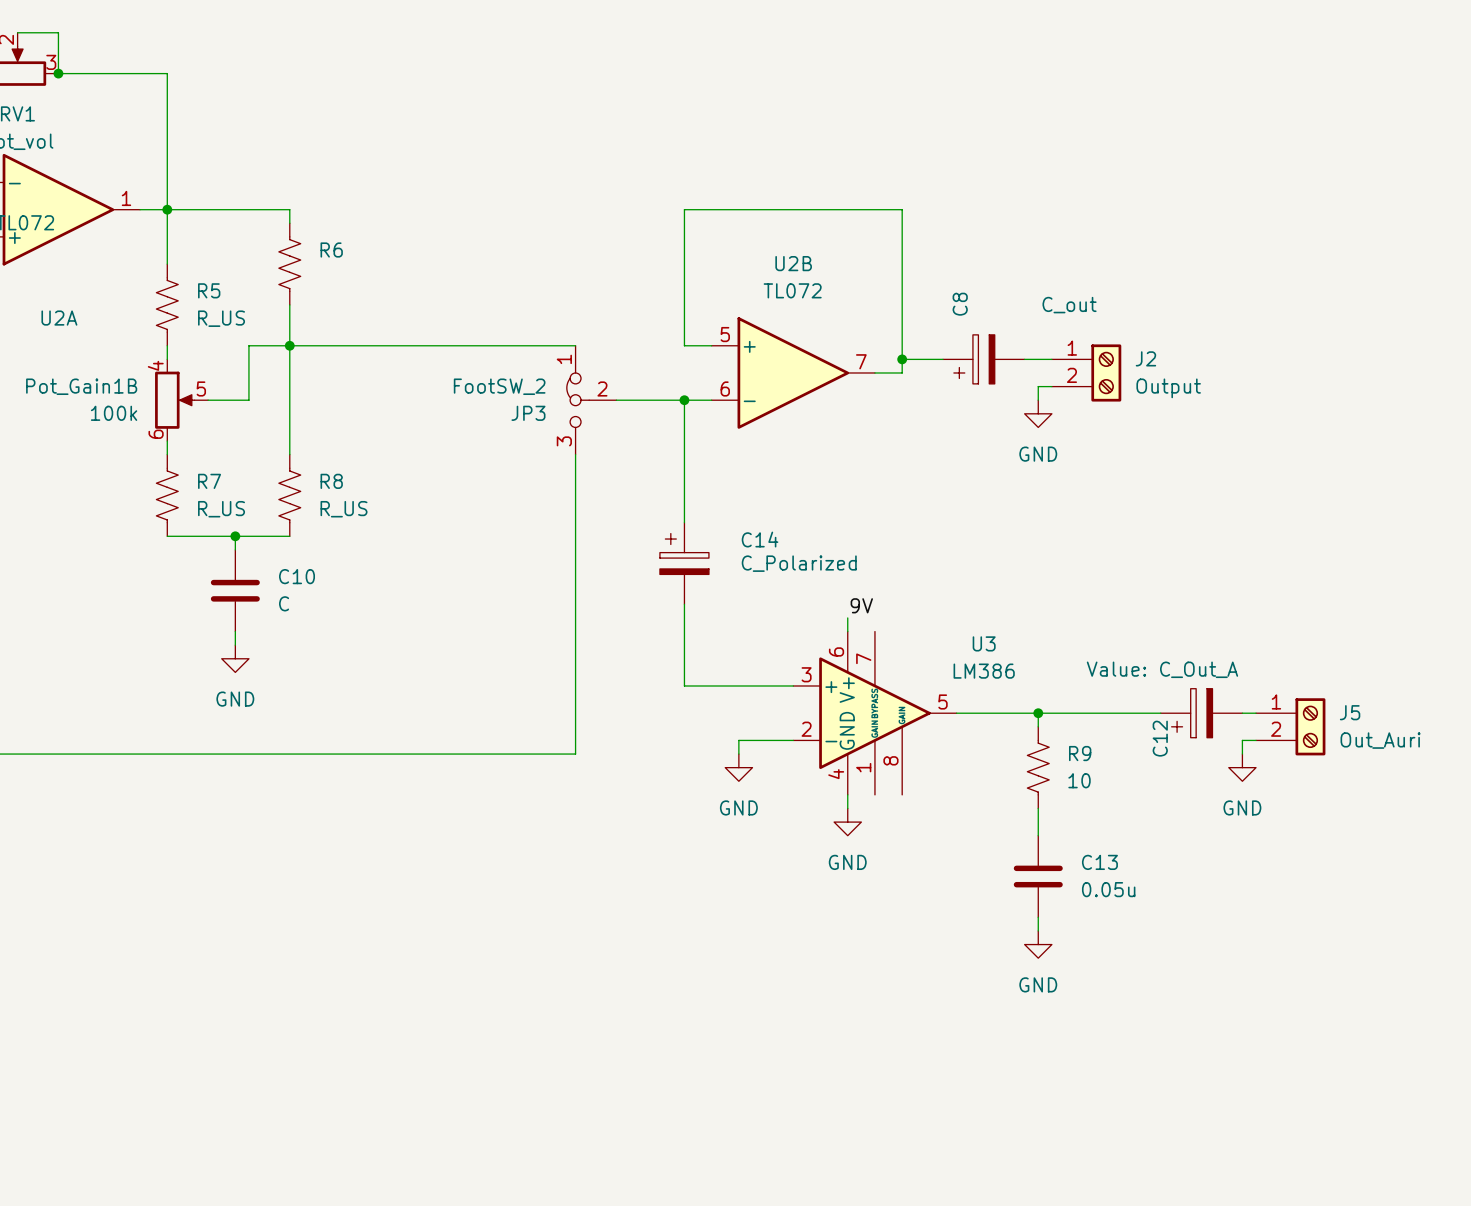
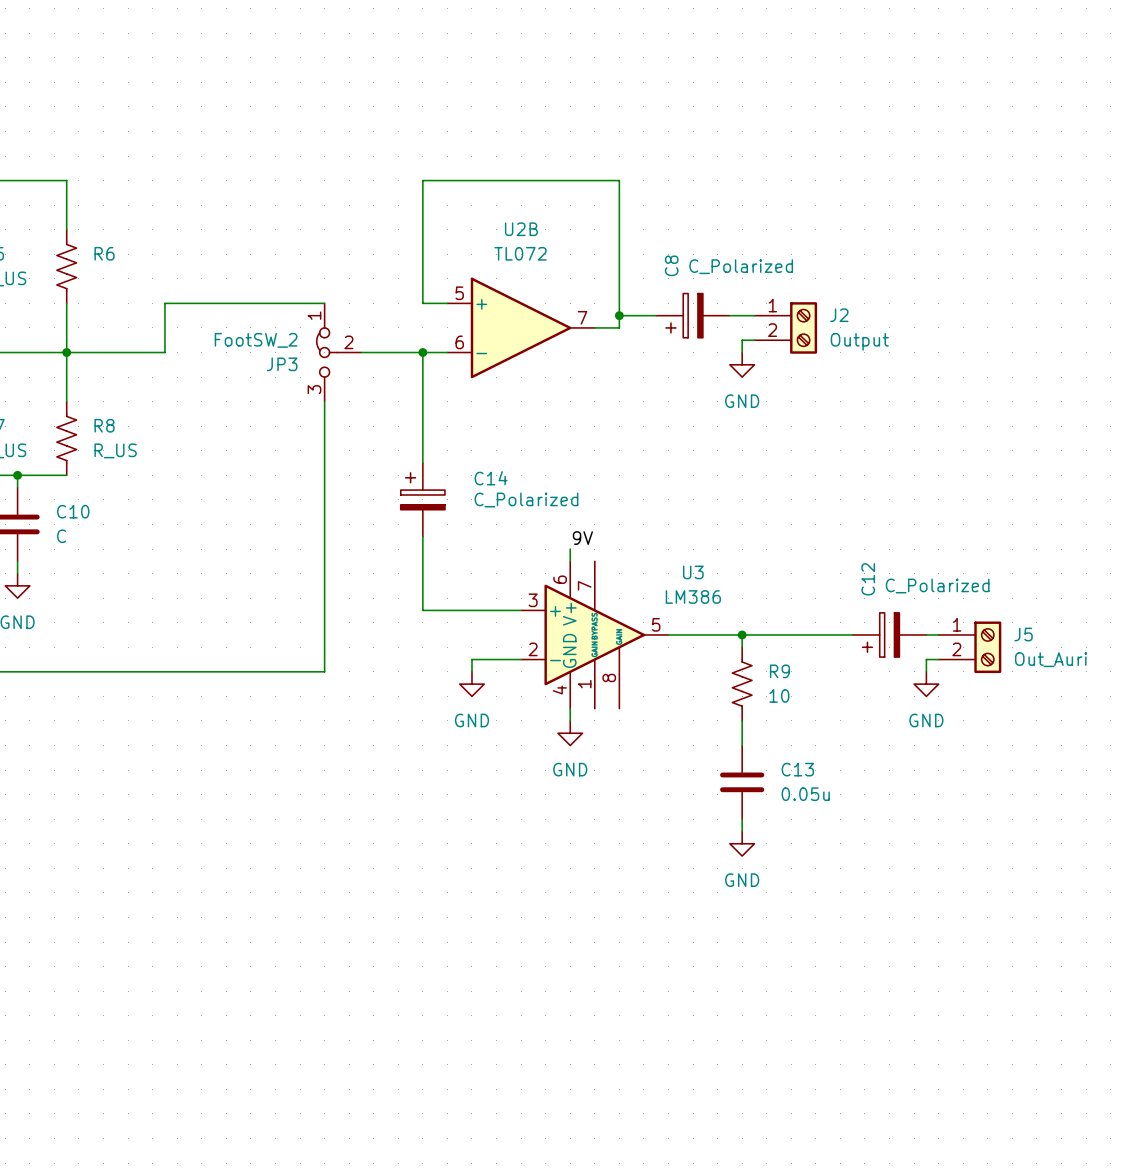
R6 position: (289, 264) -> (66, 266)
C8 value: C_out (1069, 305) -> C_Polarized (741, 266)
junction position: (289, 345) -> (66, 352)
wire: (398, 345) (248, 345) (248, 400) -> (164, 303) (164, 352) (29, 352)
C12 value: Value: C_Out_A (1162, 669) -> C_Polarized (937, 585)
C12 name position: C12 (1160, 738) -> C12 (868, 579)

